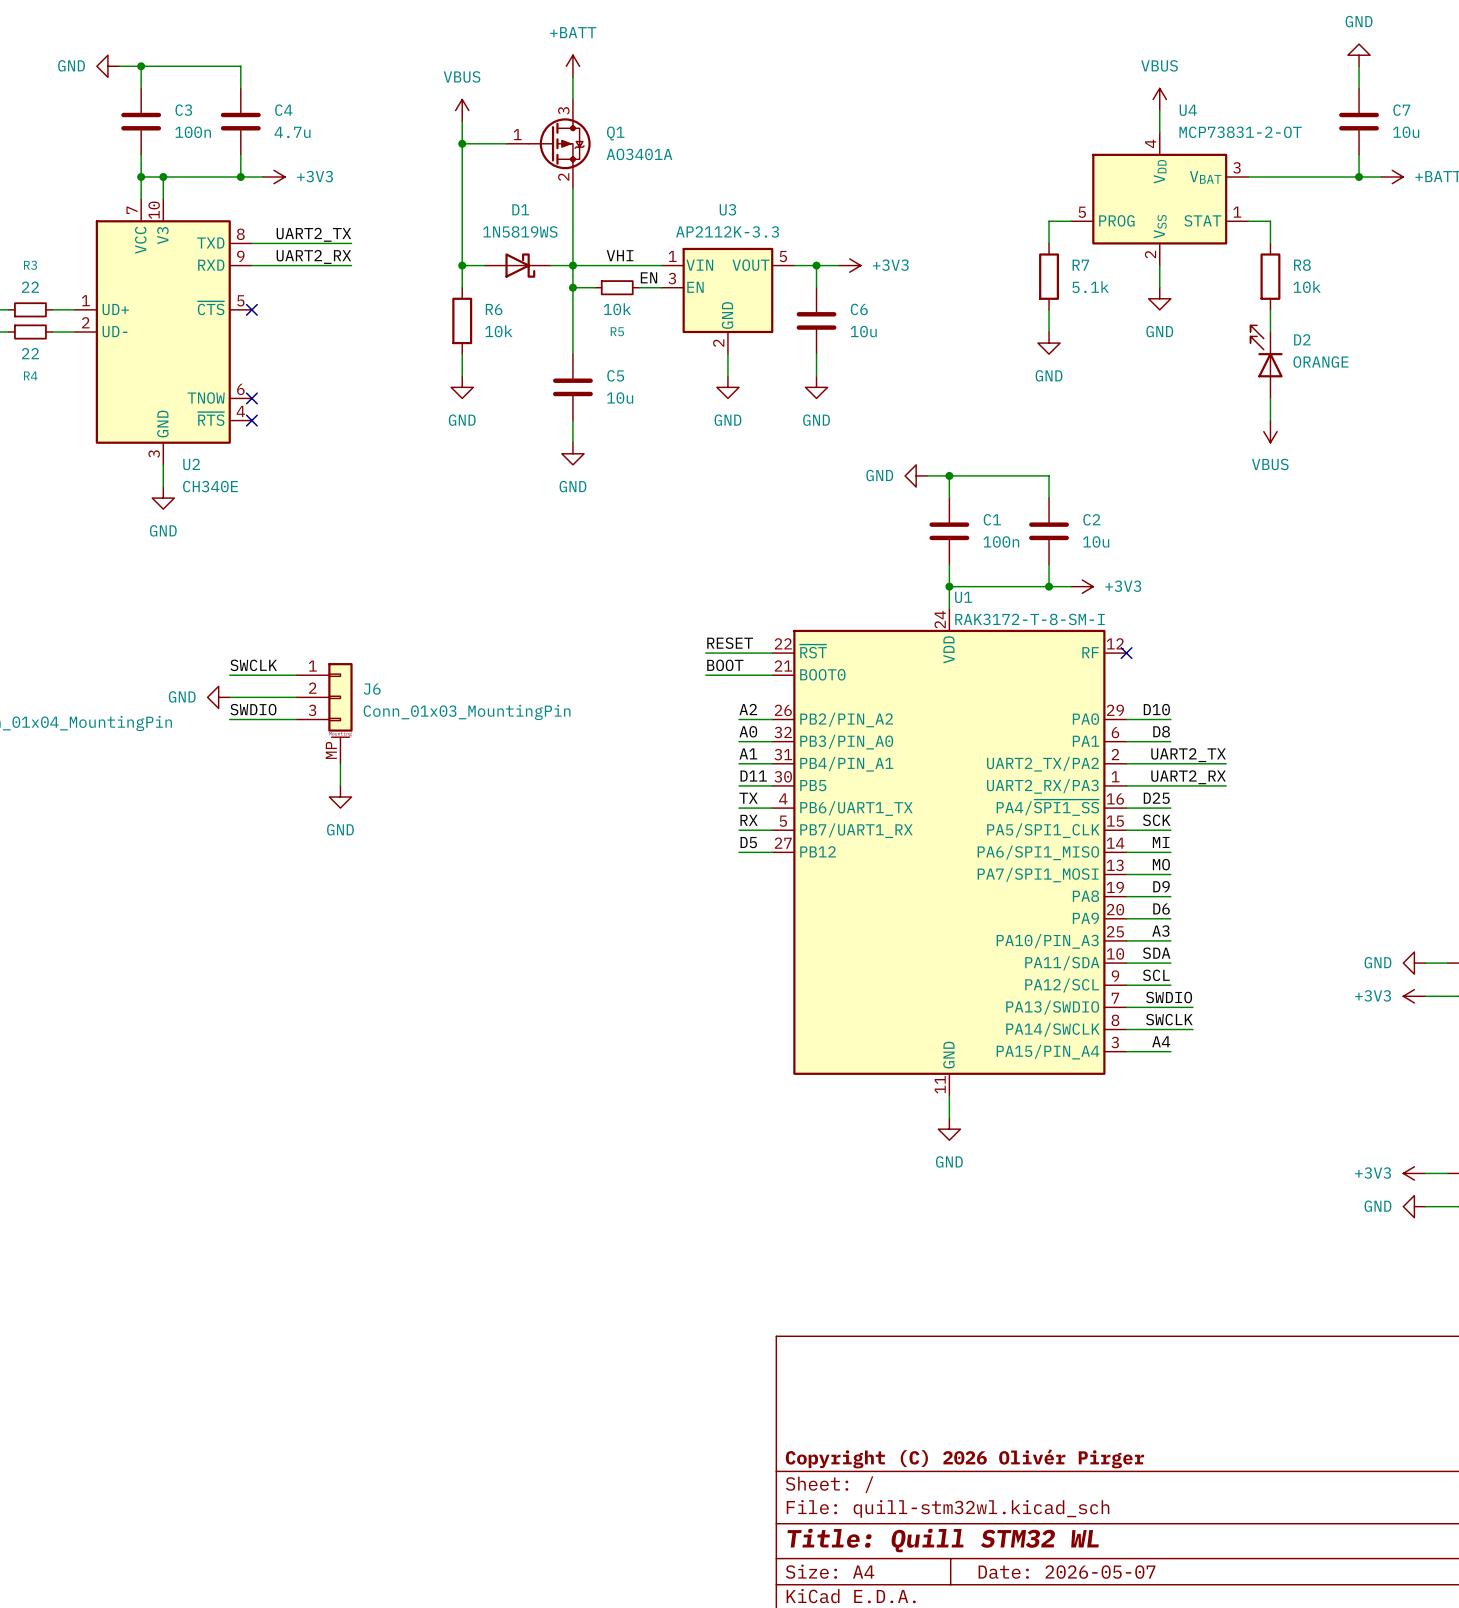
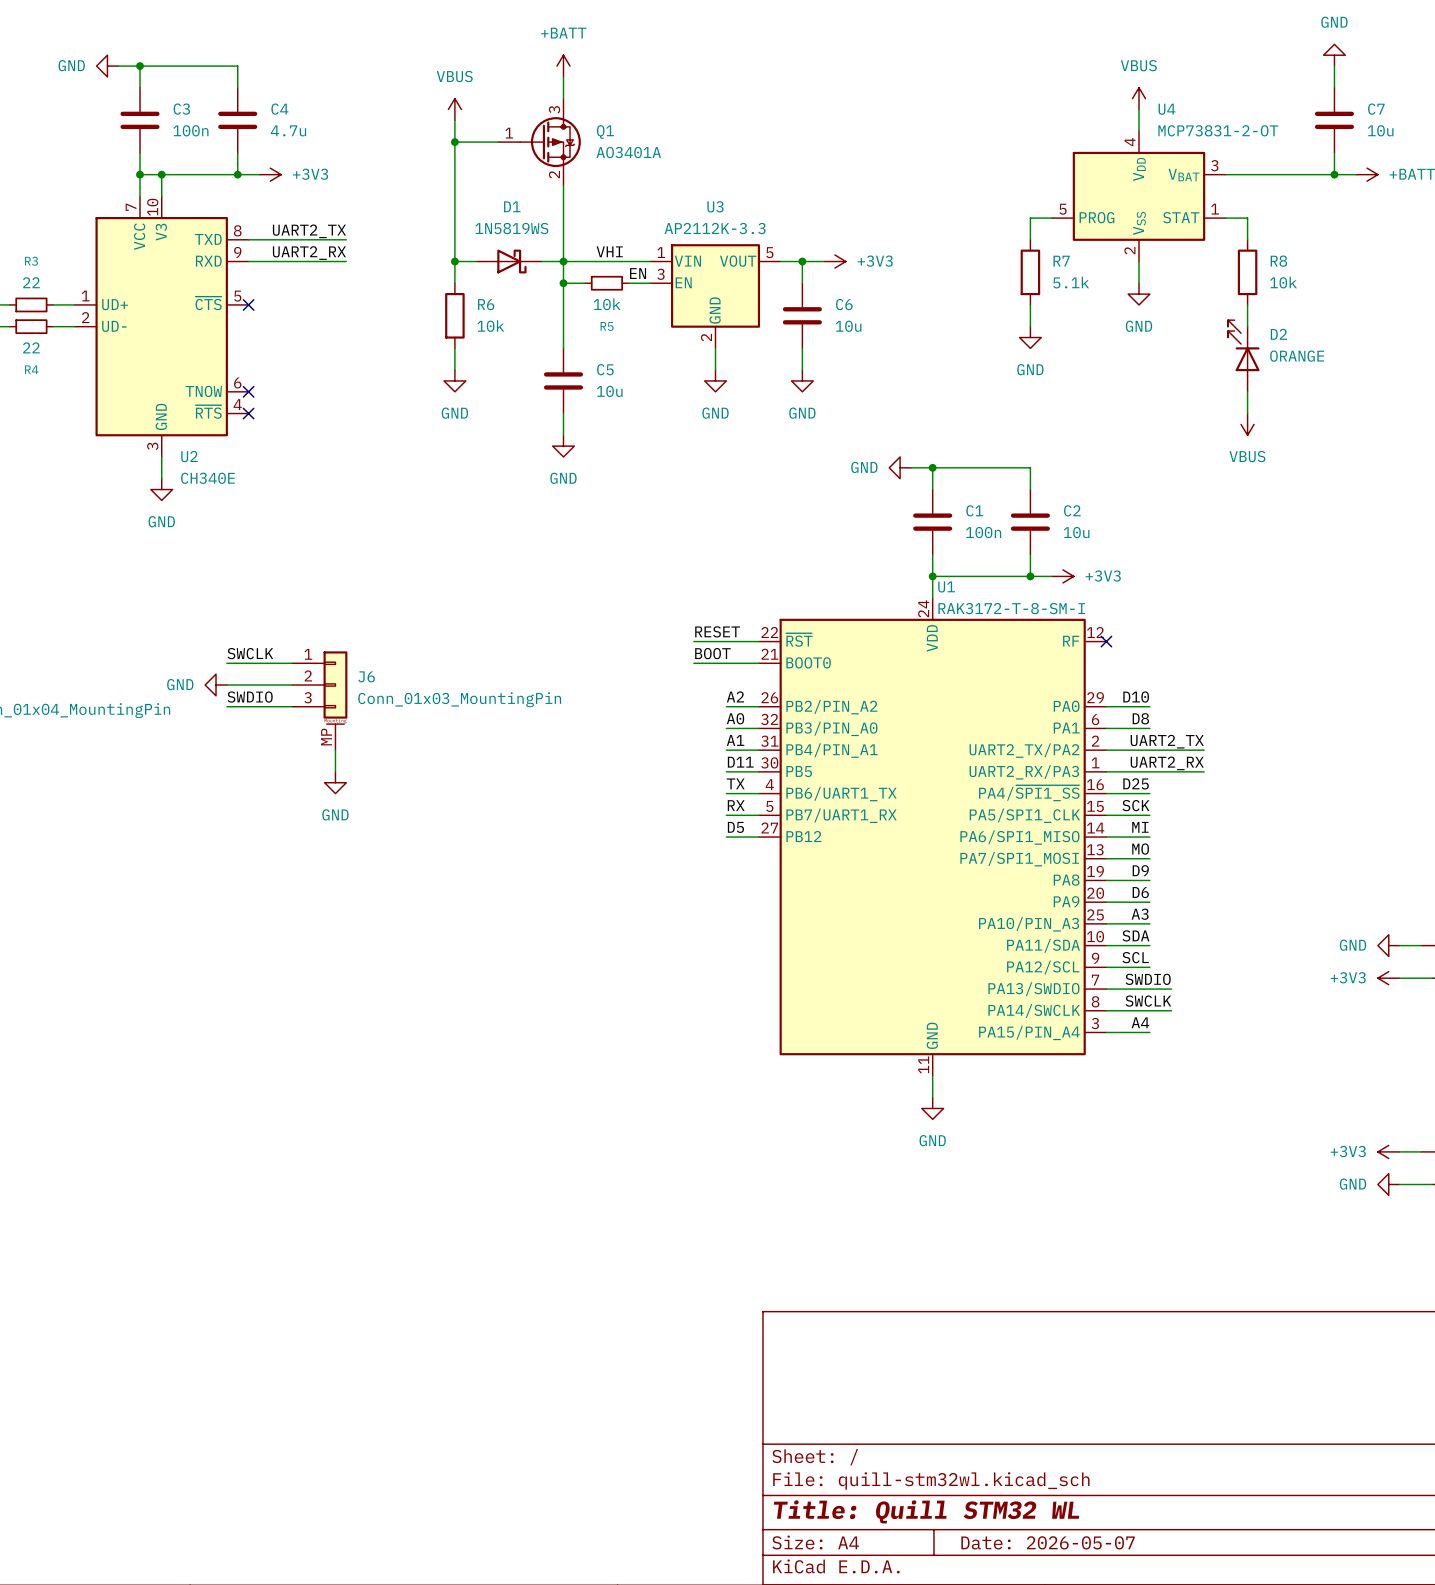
title block: Copyright (C) 2026 Olivér Pirger (964, 1458) -> none

